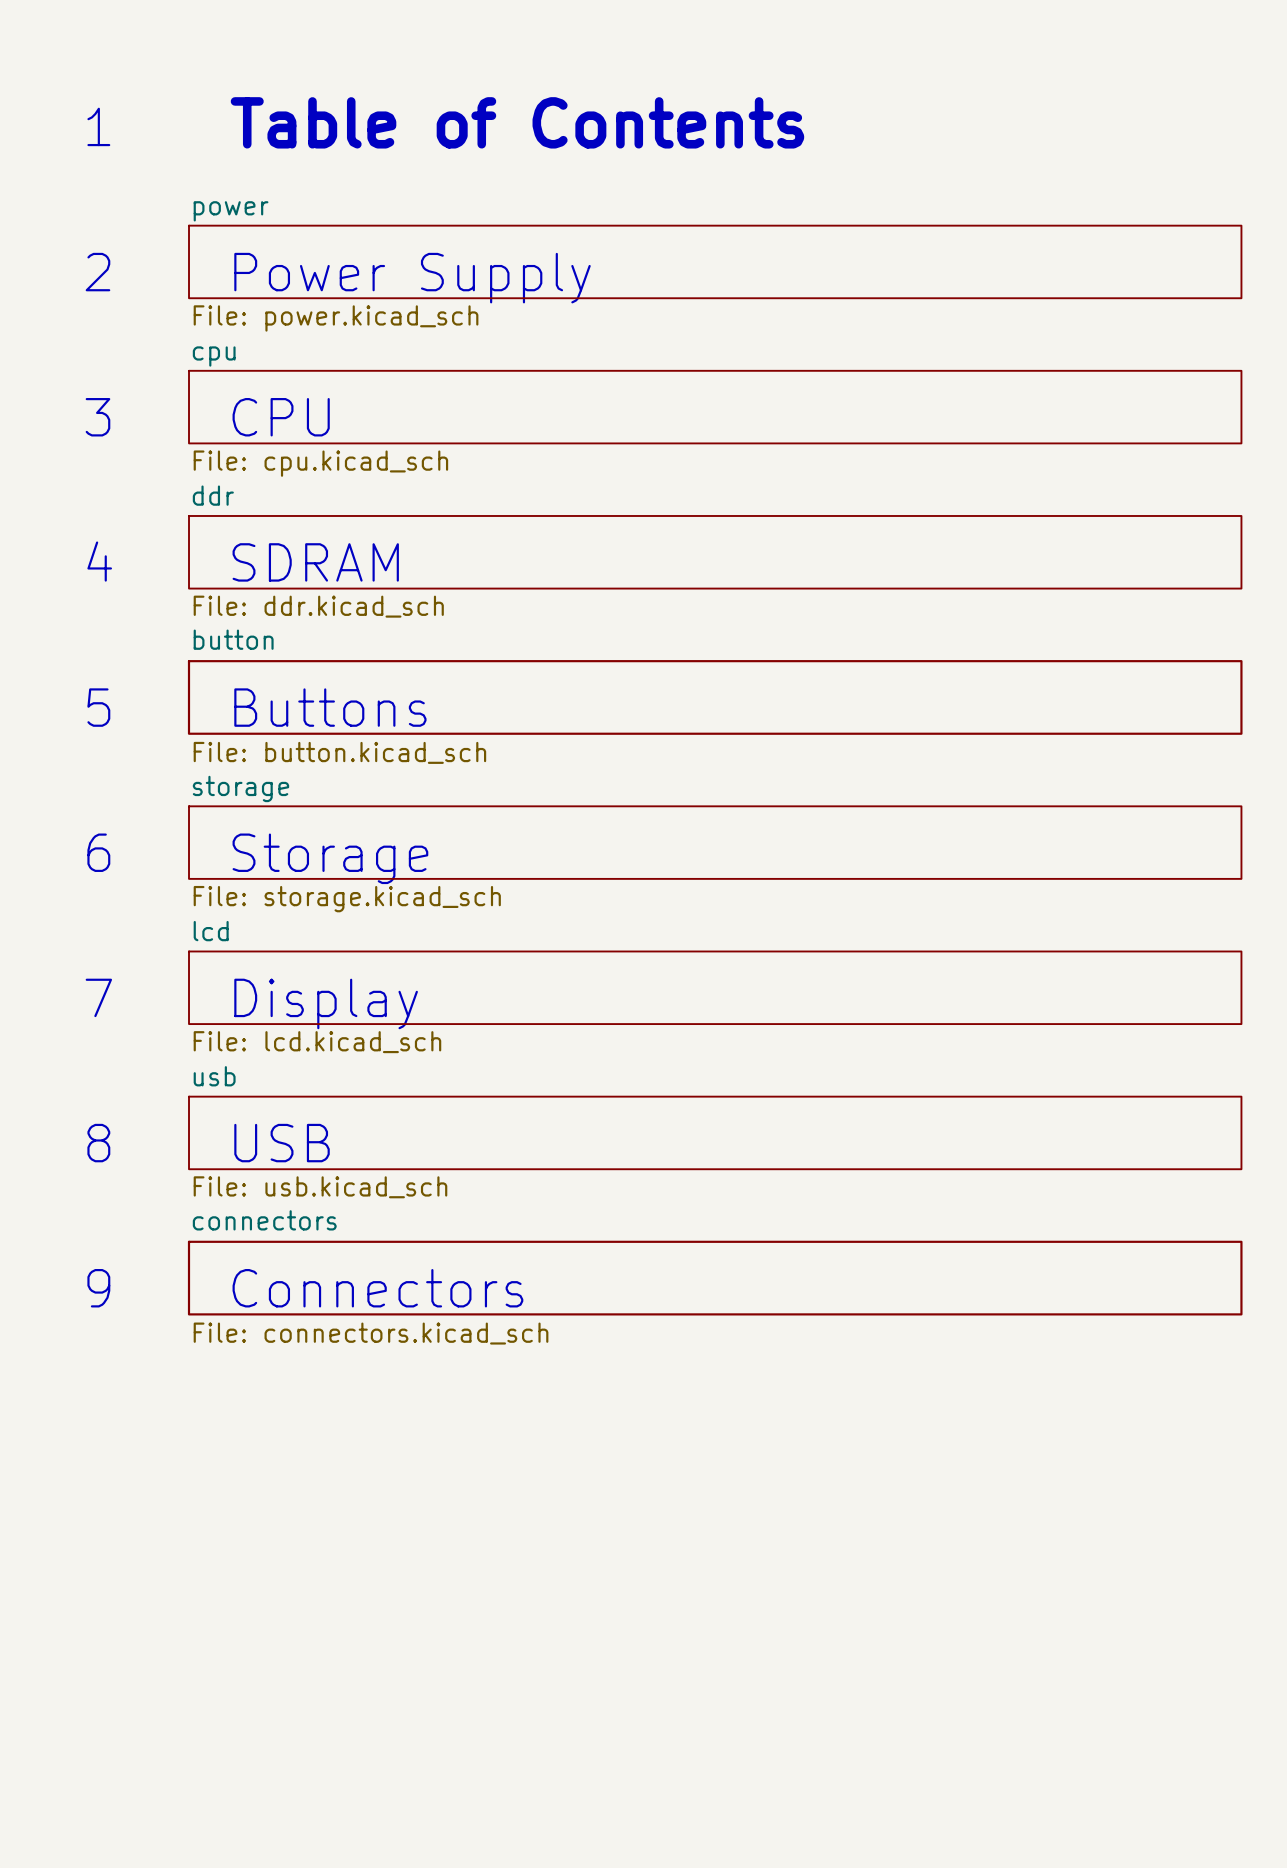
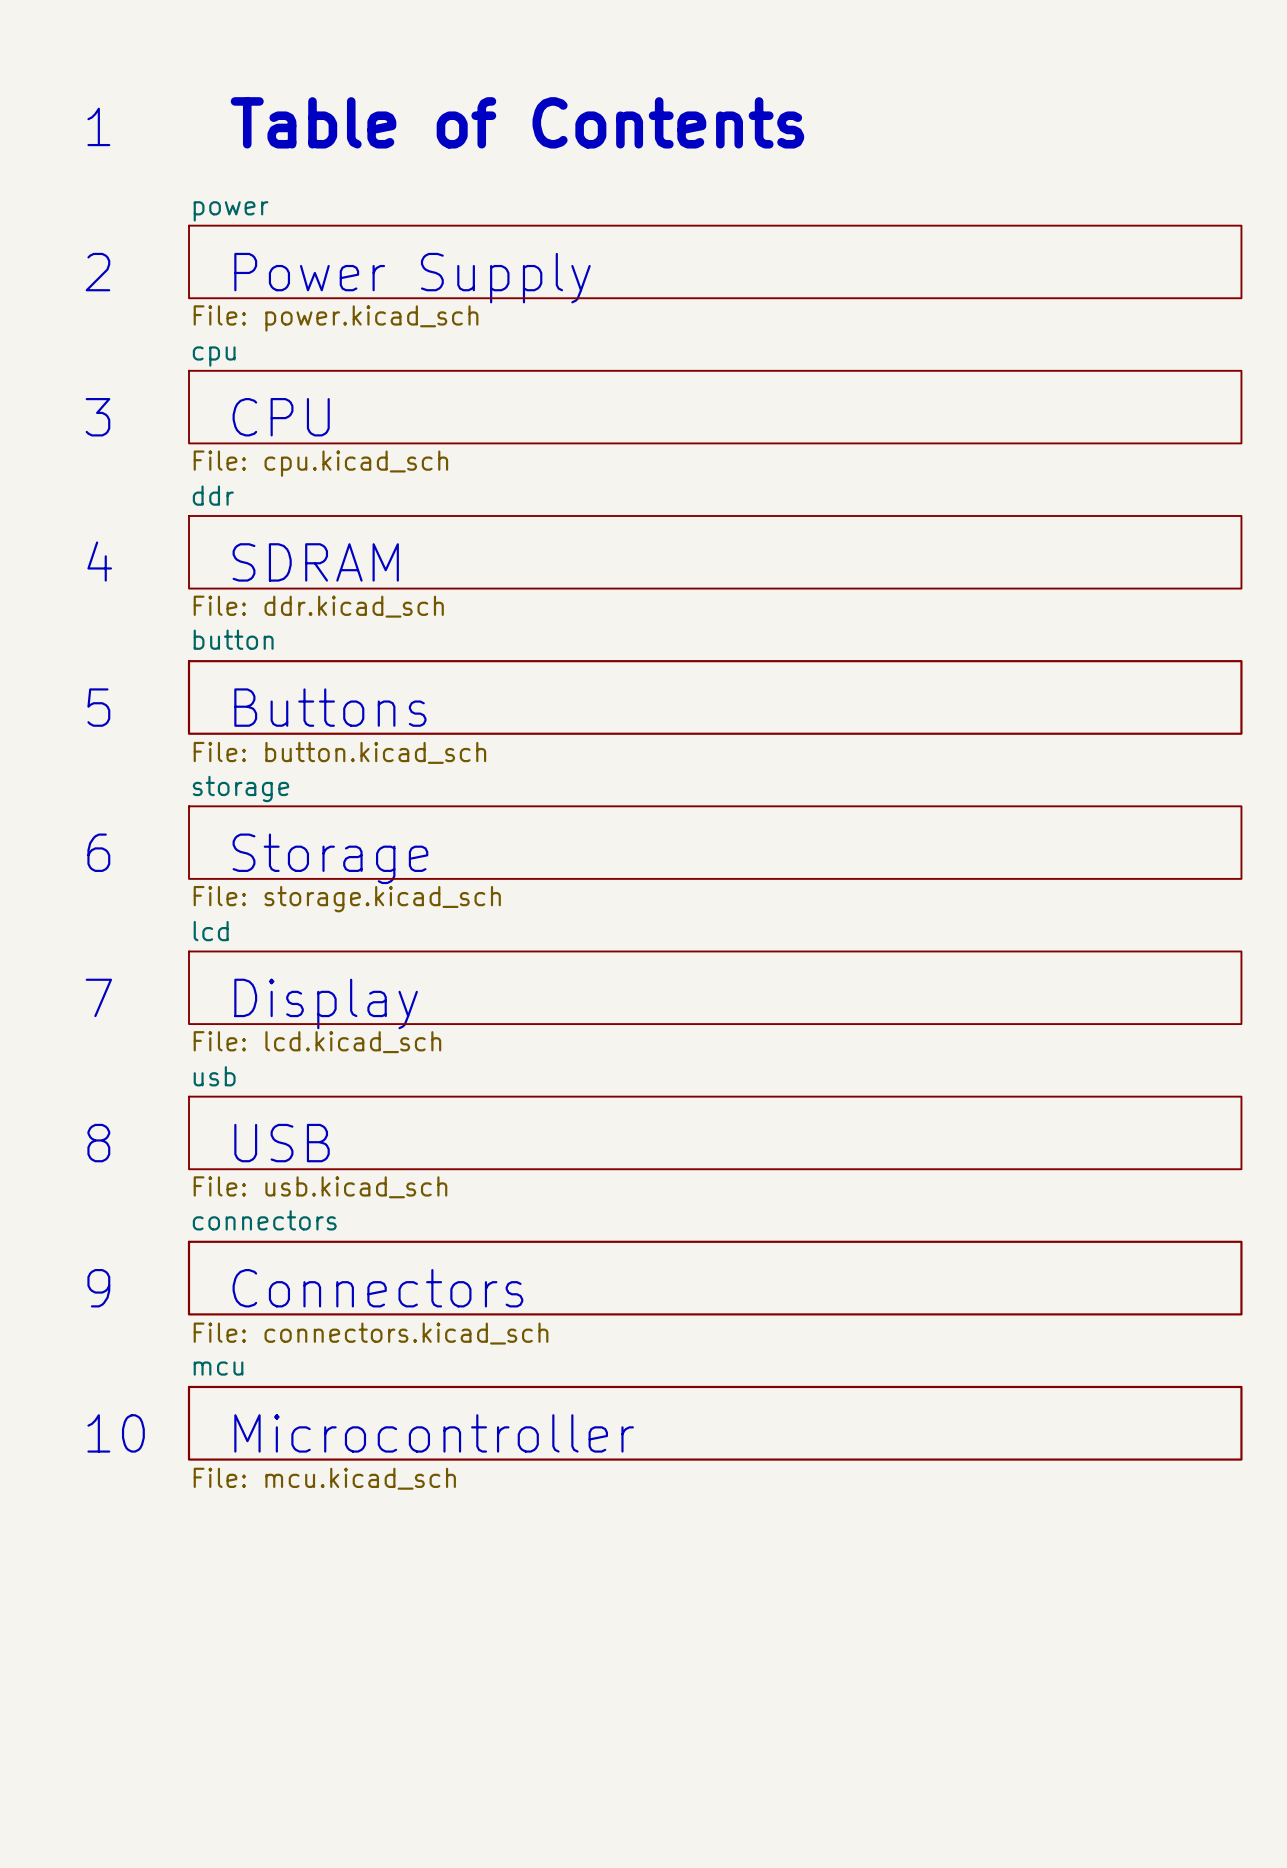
sheet mcu: none -> File: mcu.kicad_sch (715, 1423)
text: none -> 10 (116, 1433)
text: none -> Microcontroller (434, 1433)

